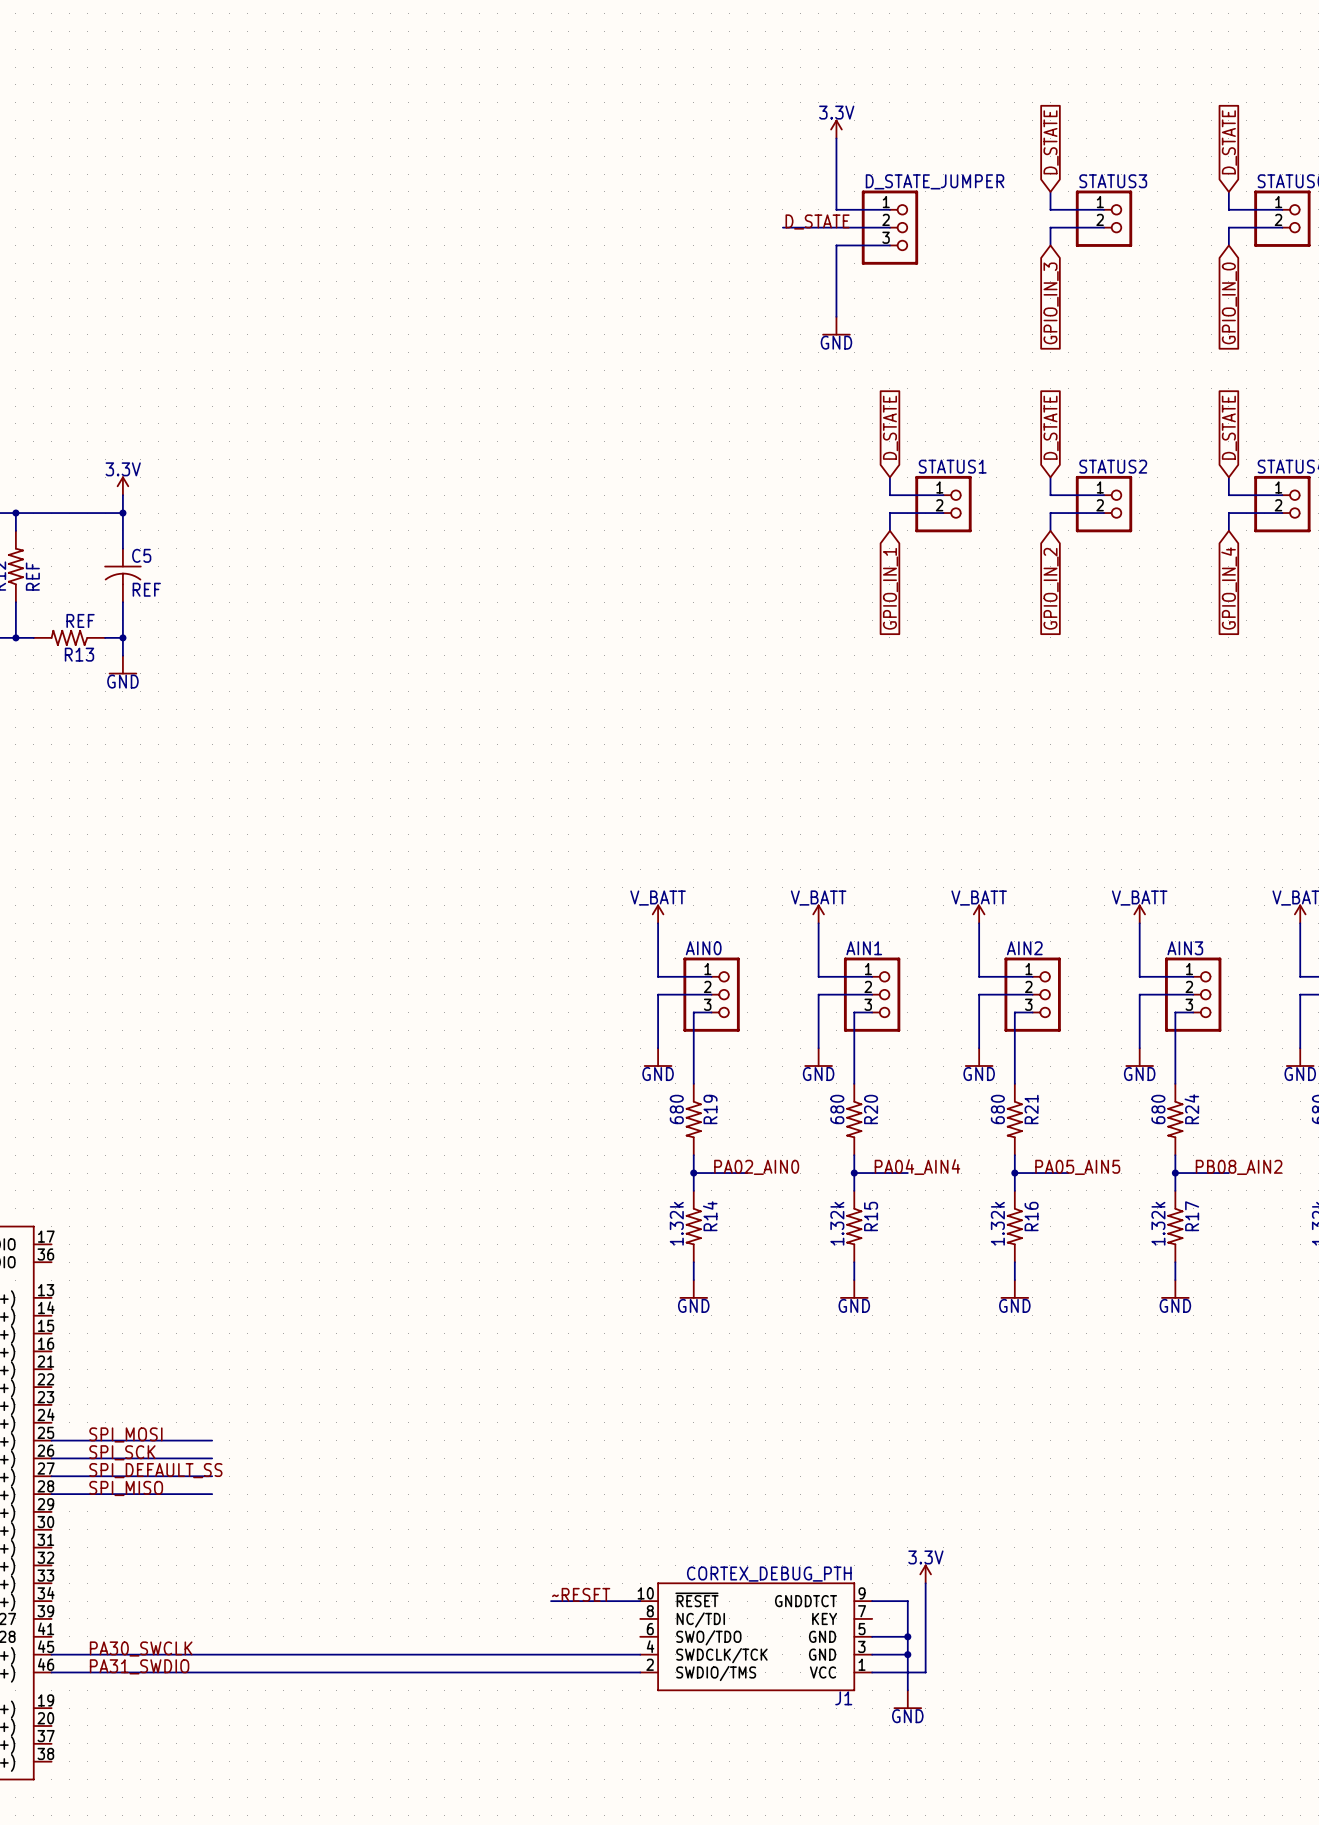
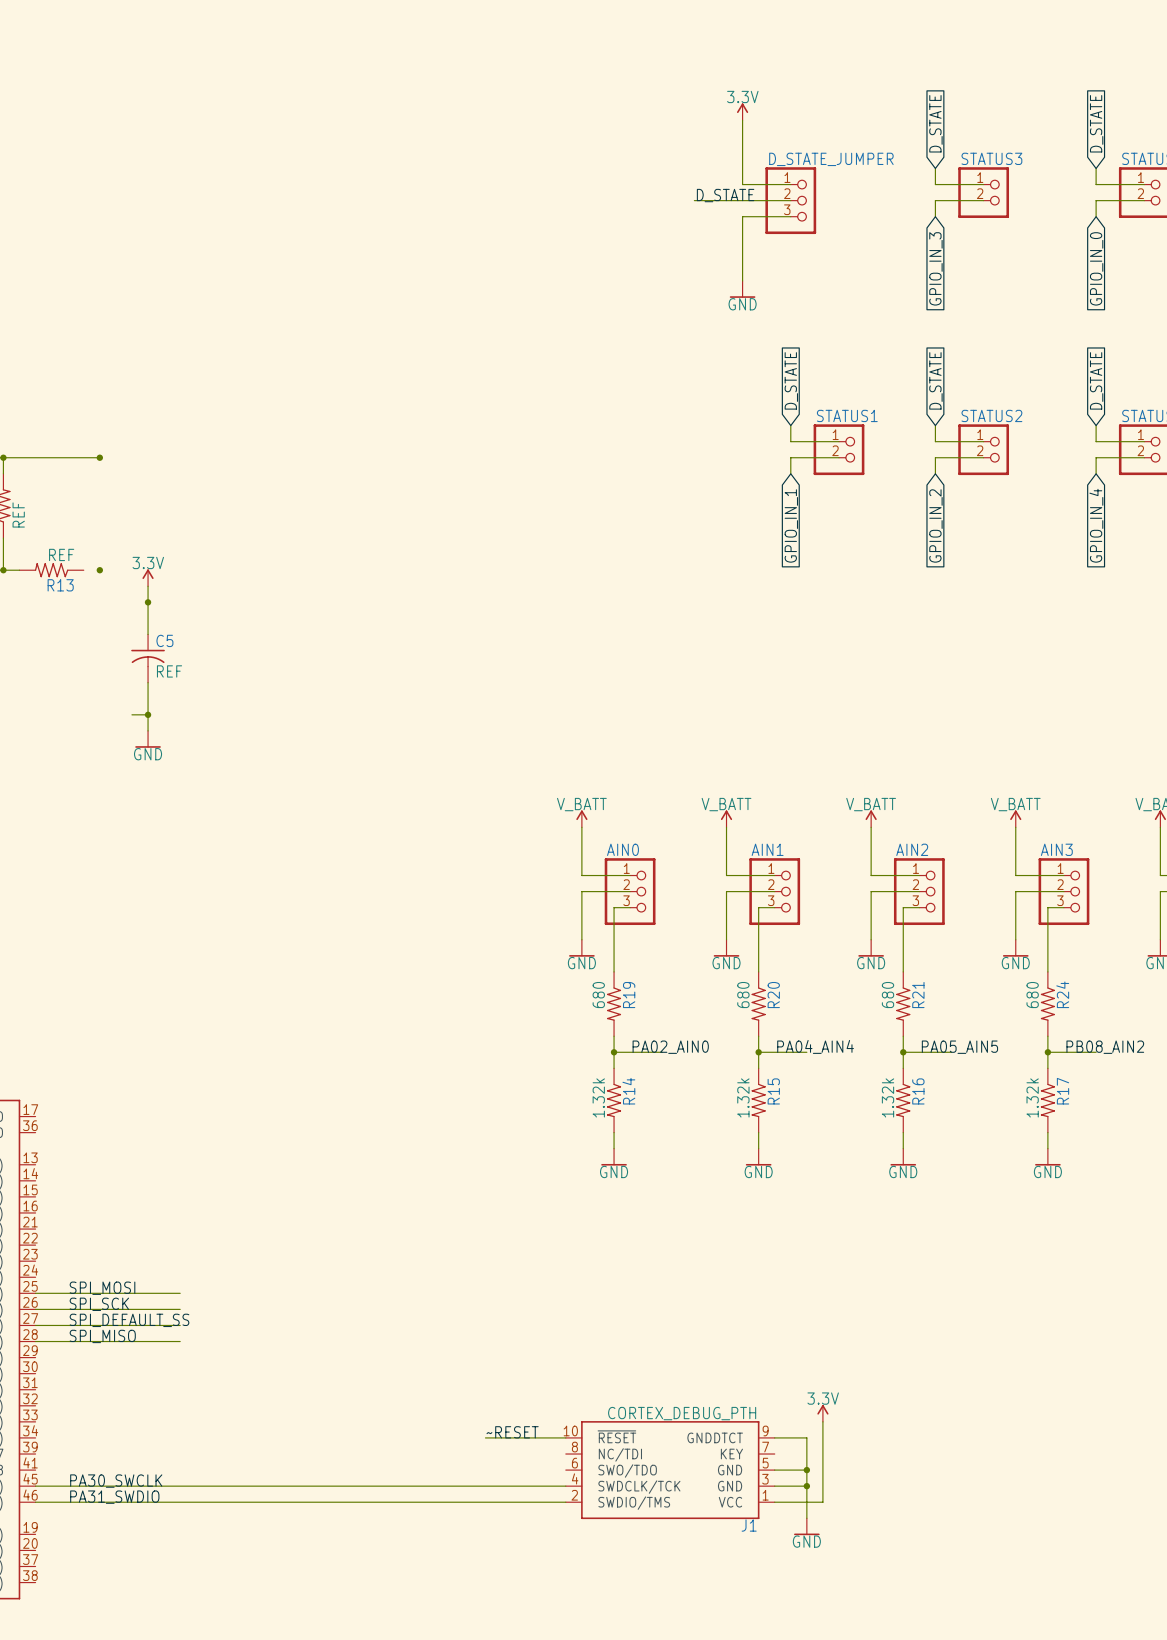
power symbol position: 3.3V (122, 485) -> 3.3V (148, 577)
wire: (122, 495) (122, 548) -> (148, 586) (148, 634)
C5 position: (122, 575) -> (148, 658)
wire: (122, 602) (122, 655) -> (148, 682) (148, 730)
wire: (105, 637) (122, 637) -> (131, 714) (148, 714)
power symbol: GND (122, 665) -> none
junction: none -> (148, 602)
junction: none -> (148, 714)
power symbol: none -> GND (148, 739)

